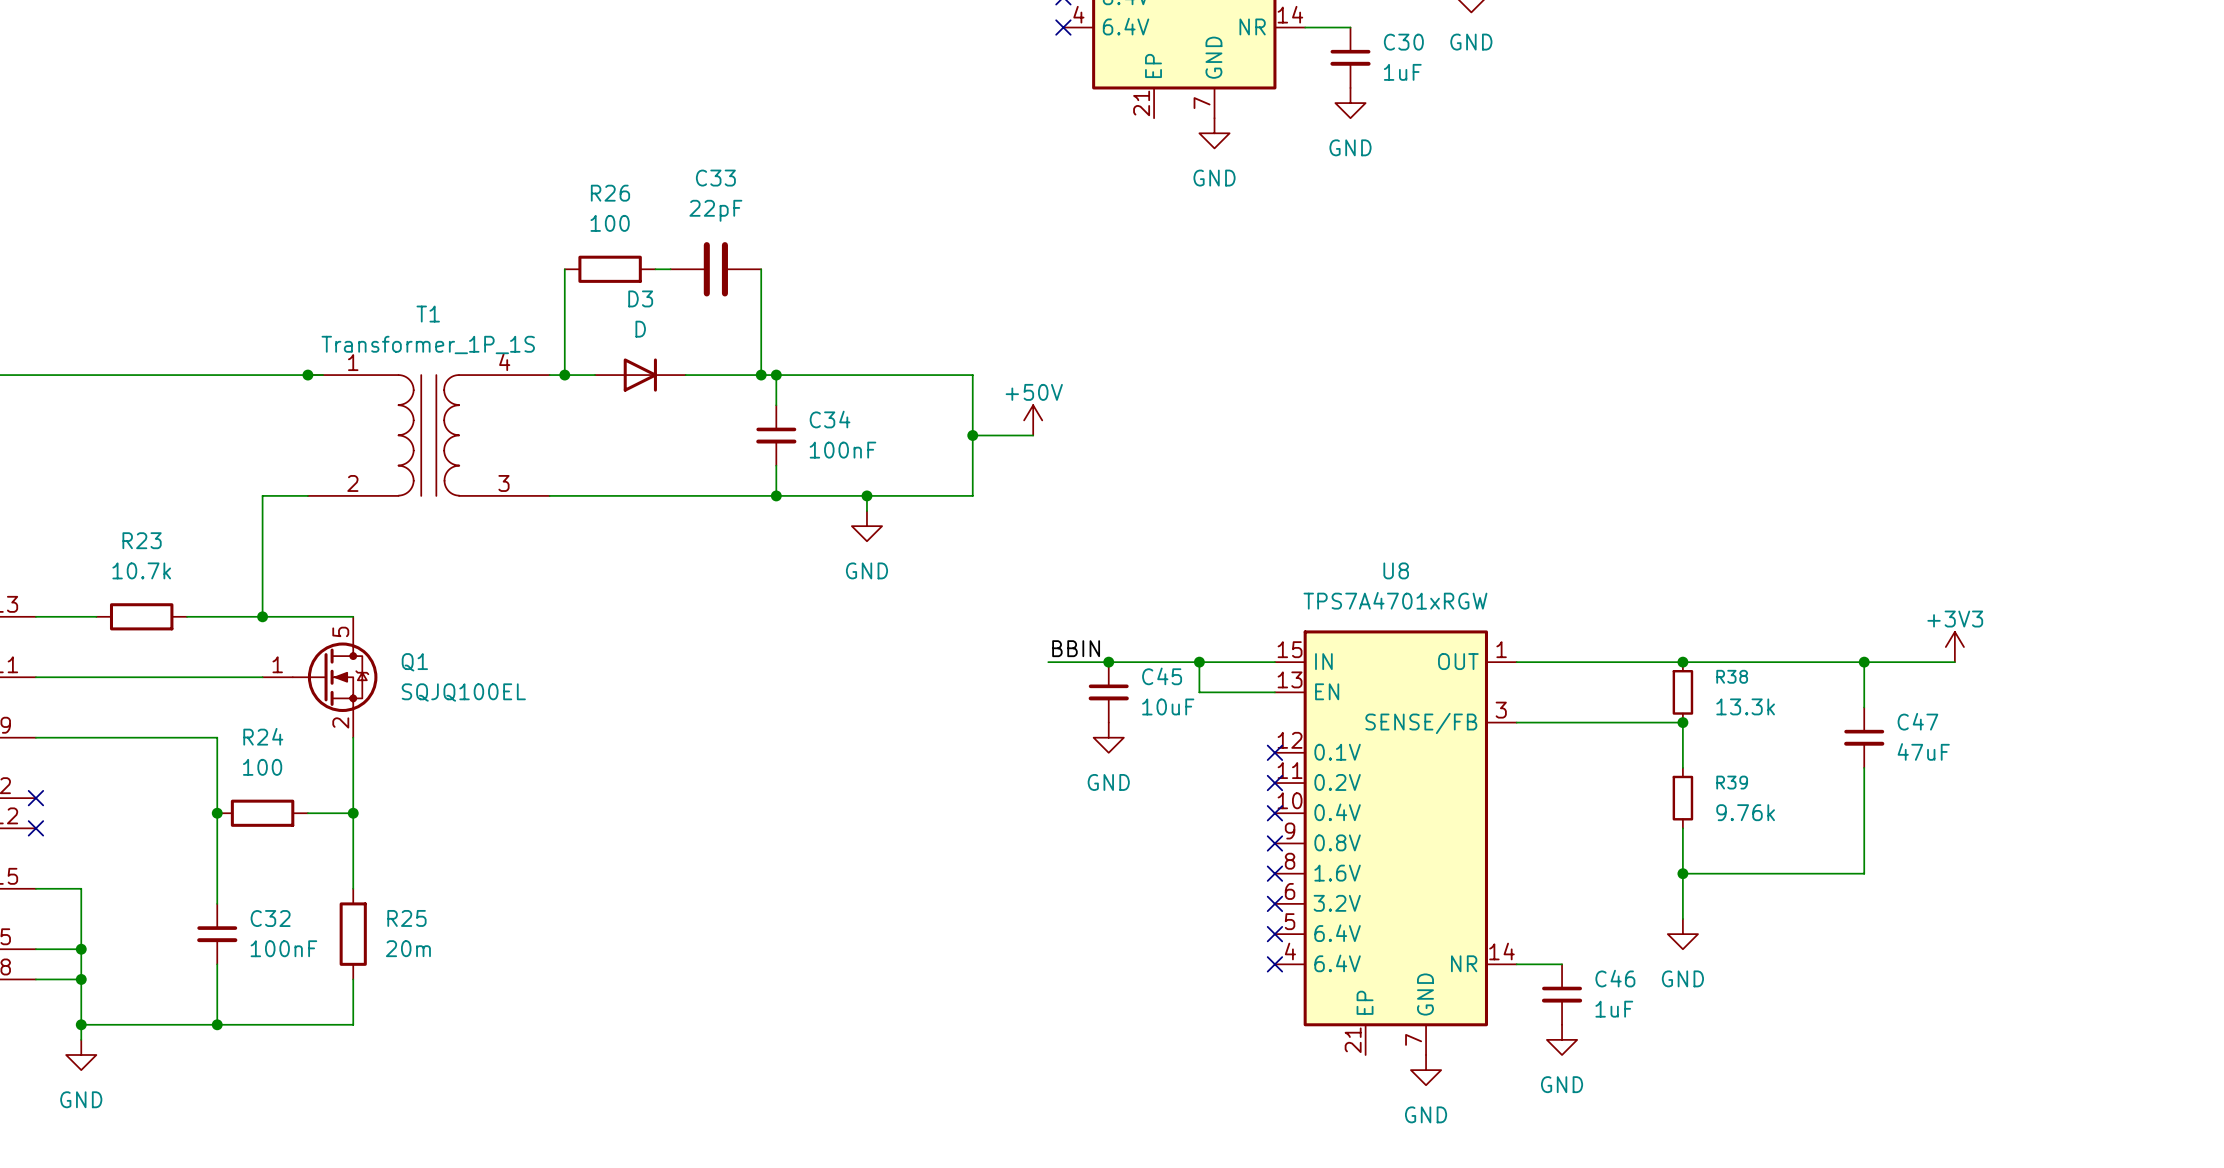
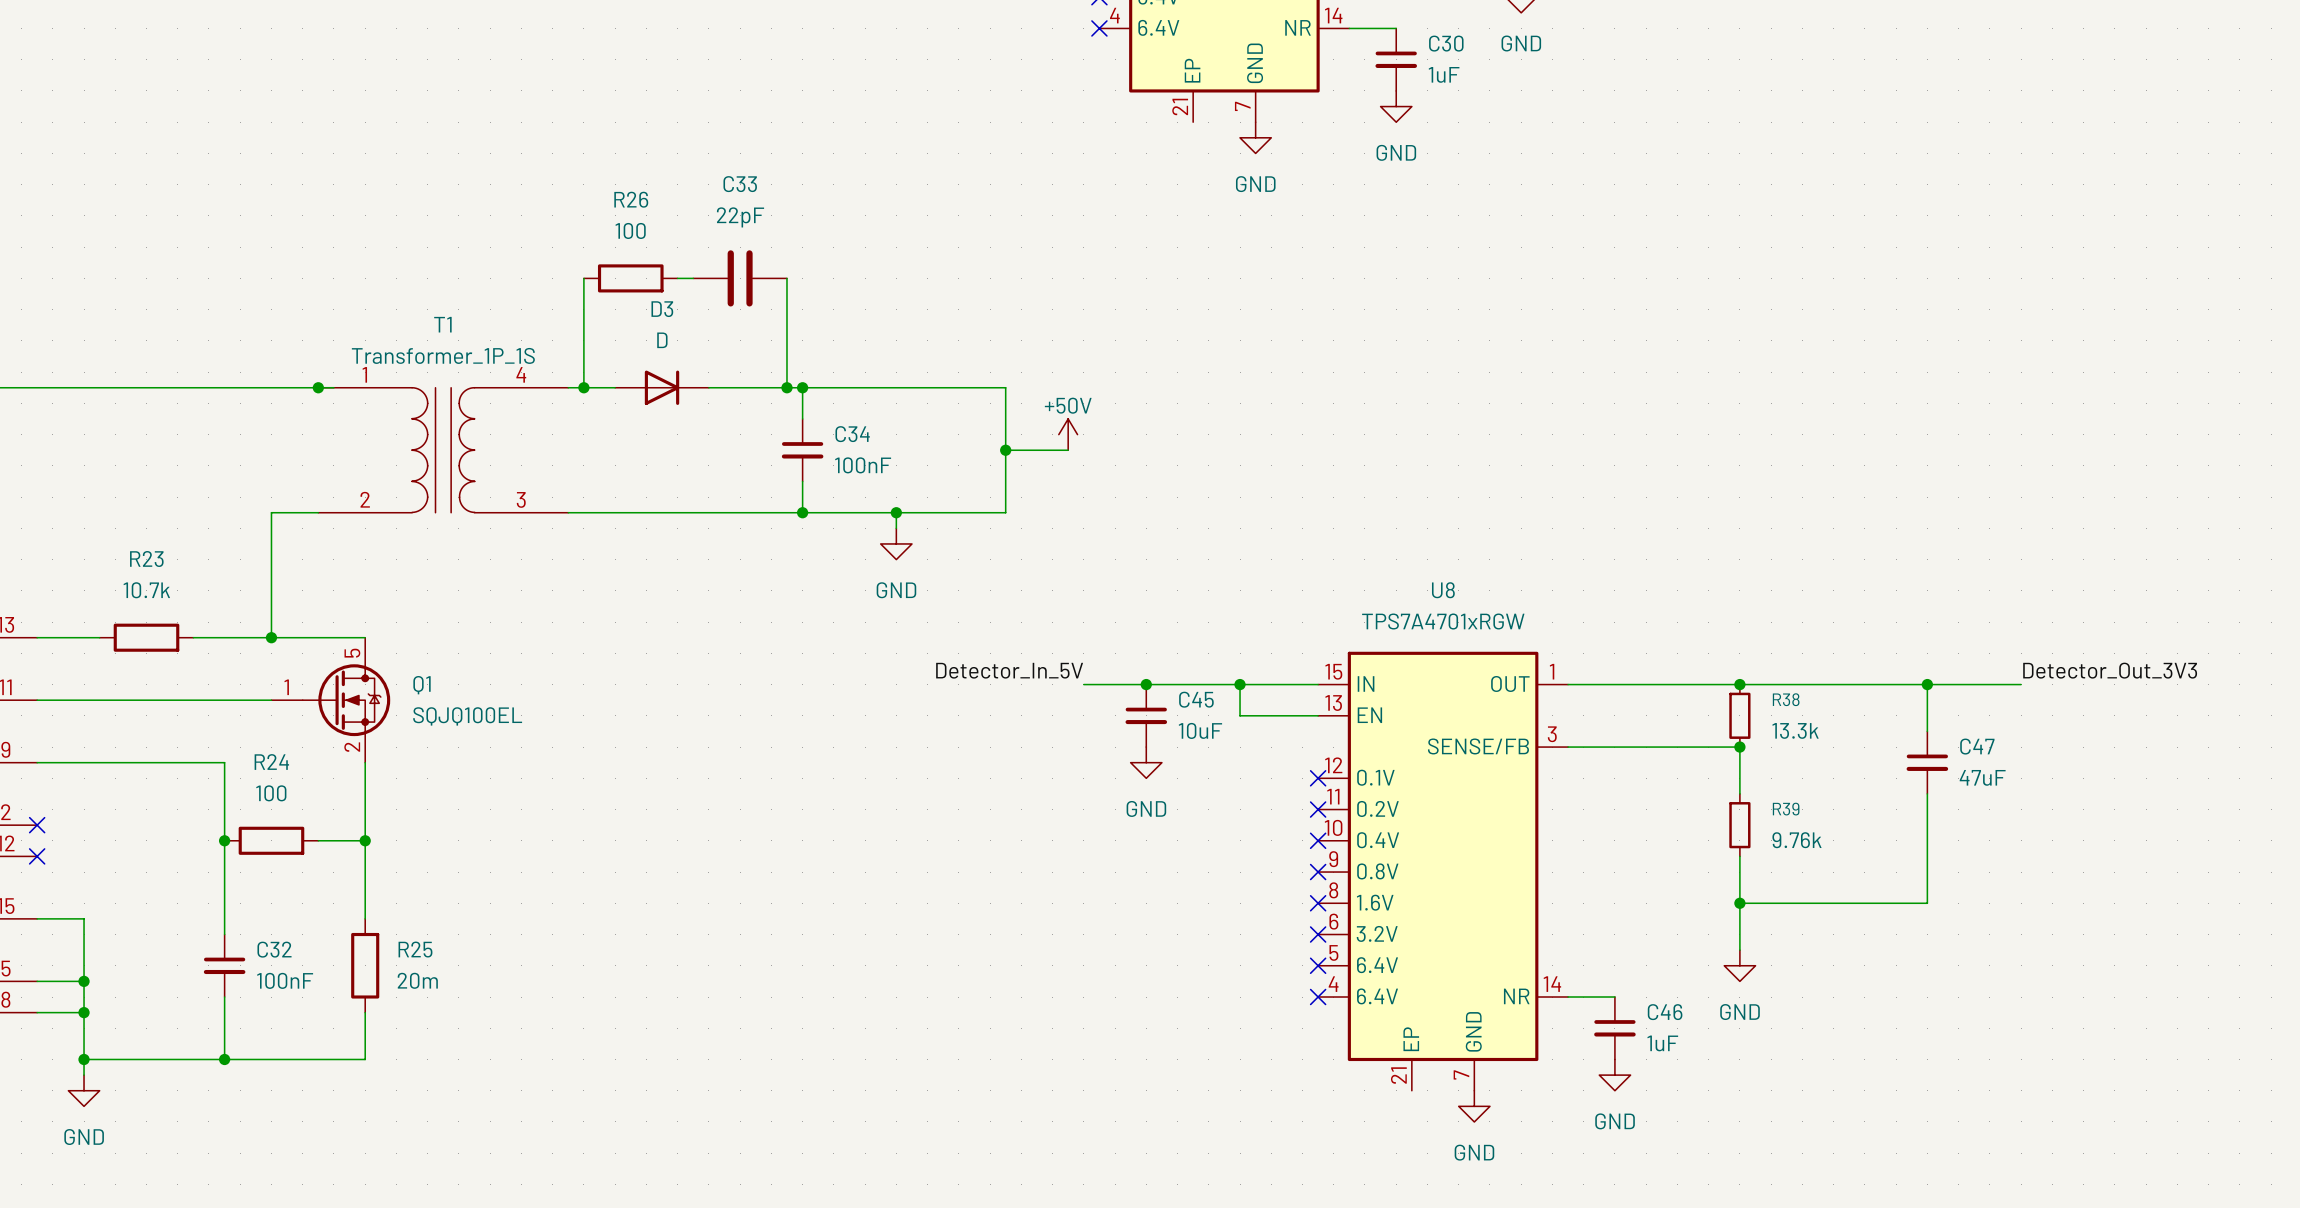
power symbol: +3V3 (1954, 647) -> none
label: BBIN (1076, 648) -> Detector_In_5V (1009, 670)
label: none -> Detector_Out_3V3 (2110, 670)

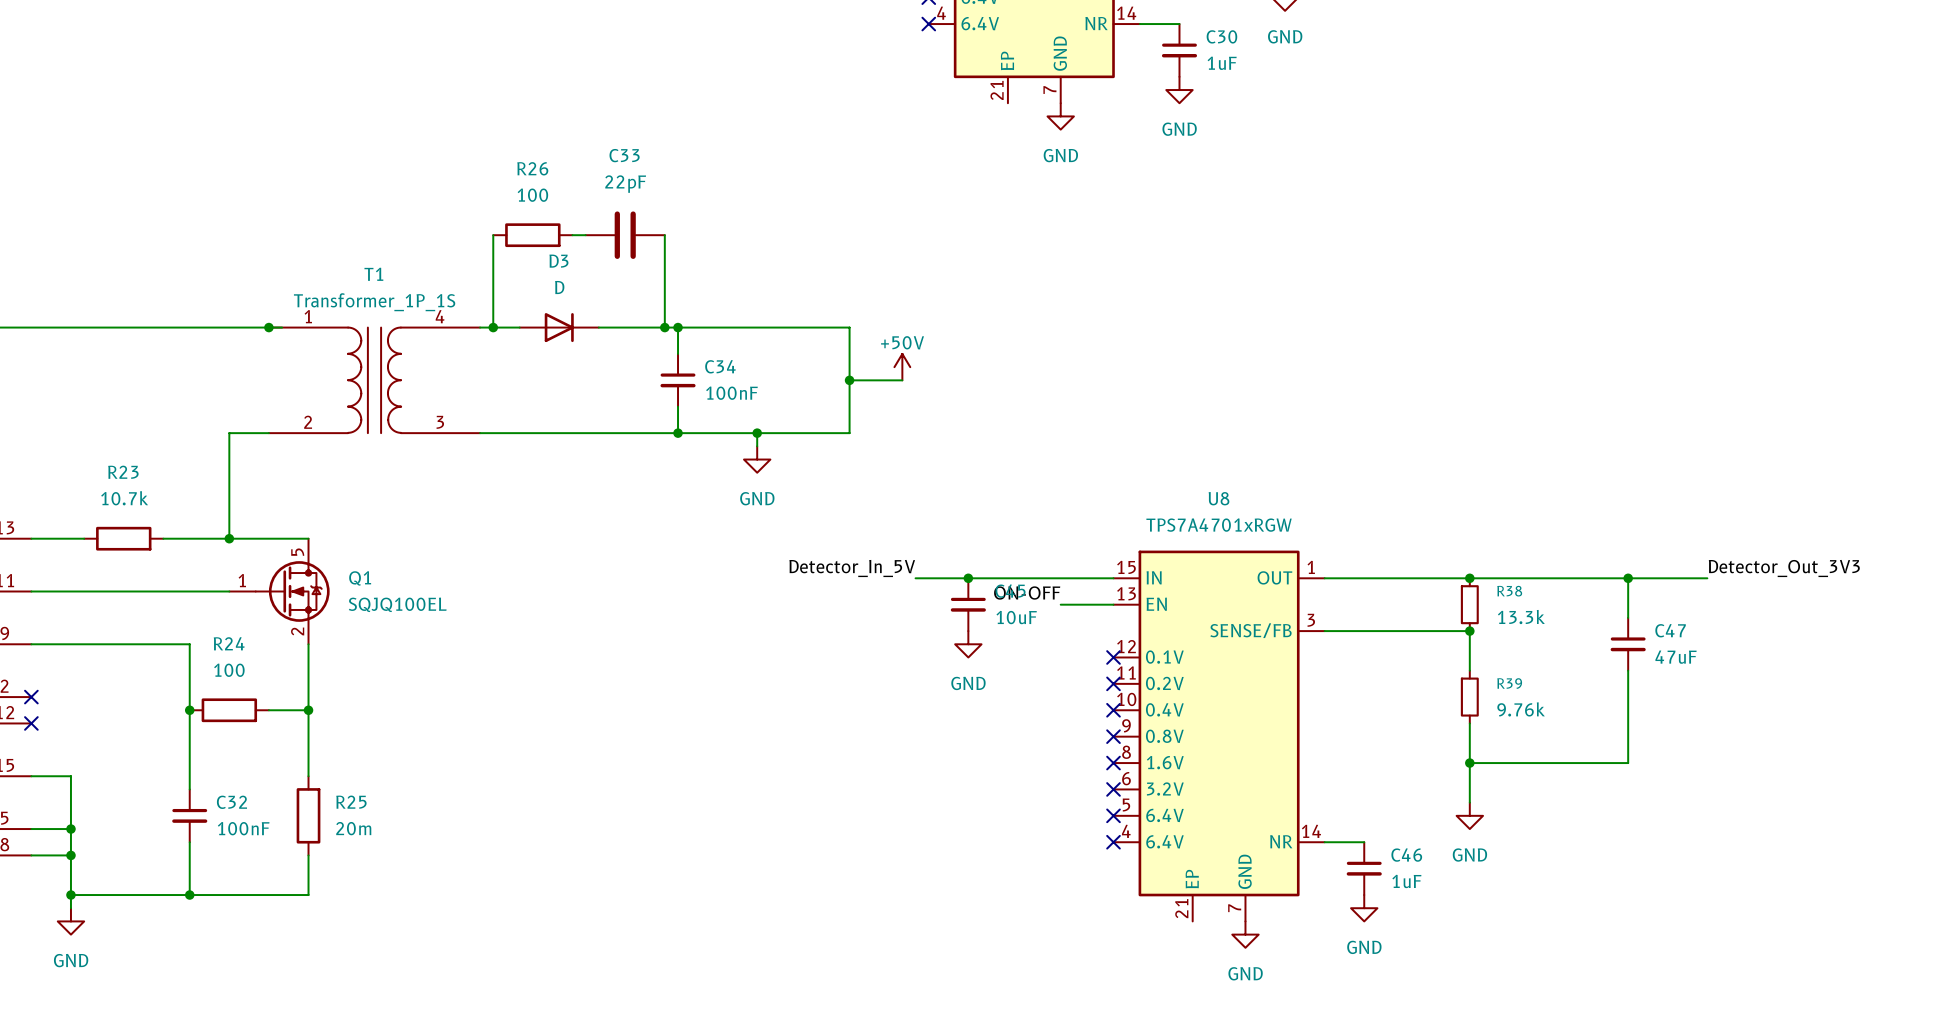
wire: (1240, 684) (1240, 715) (1255, 715) -> none
junction: (1240, 684) -> none
label: none -> ON-OFF (1027, 592)

